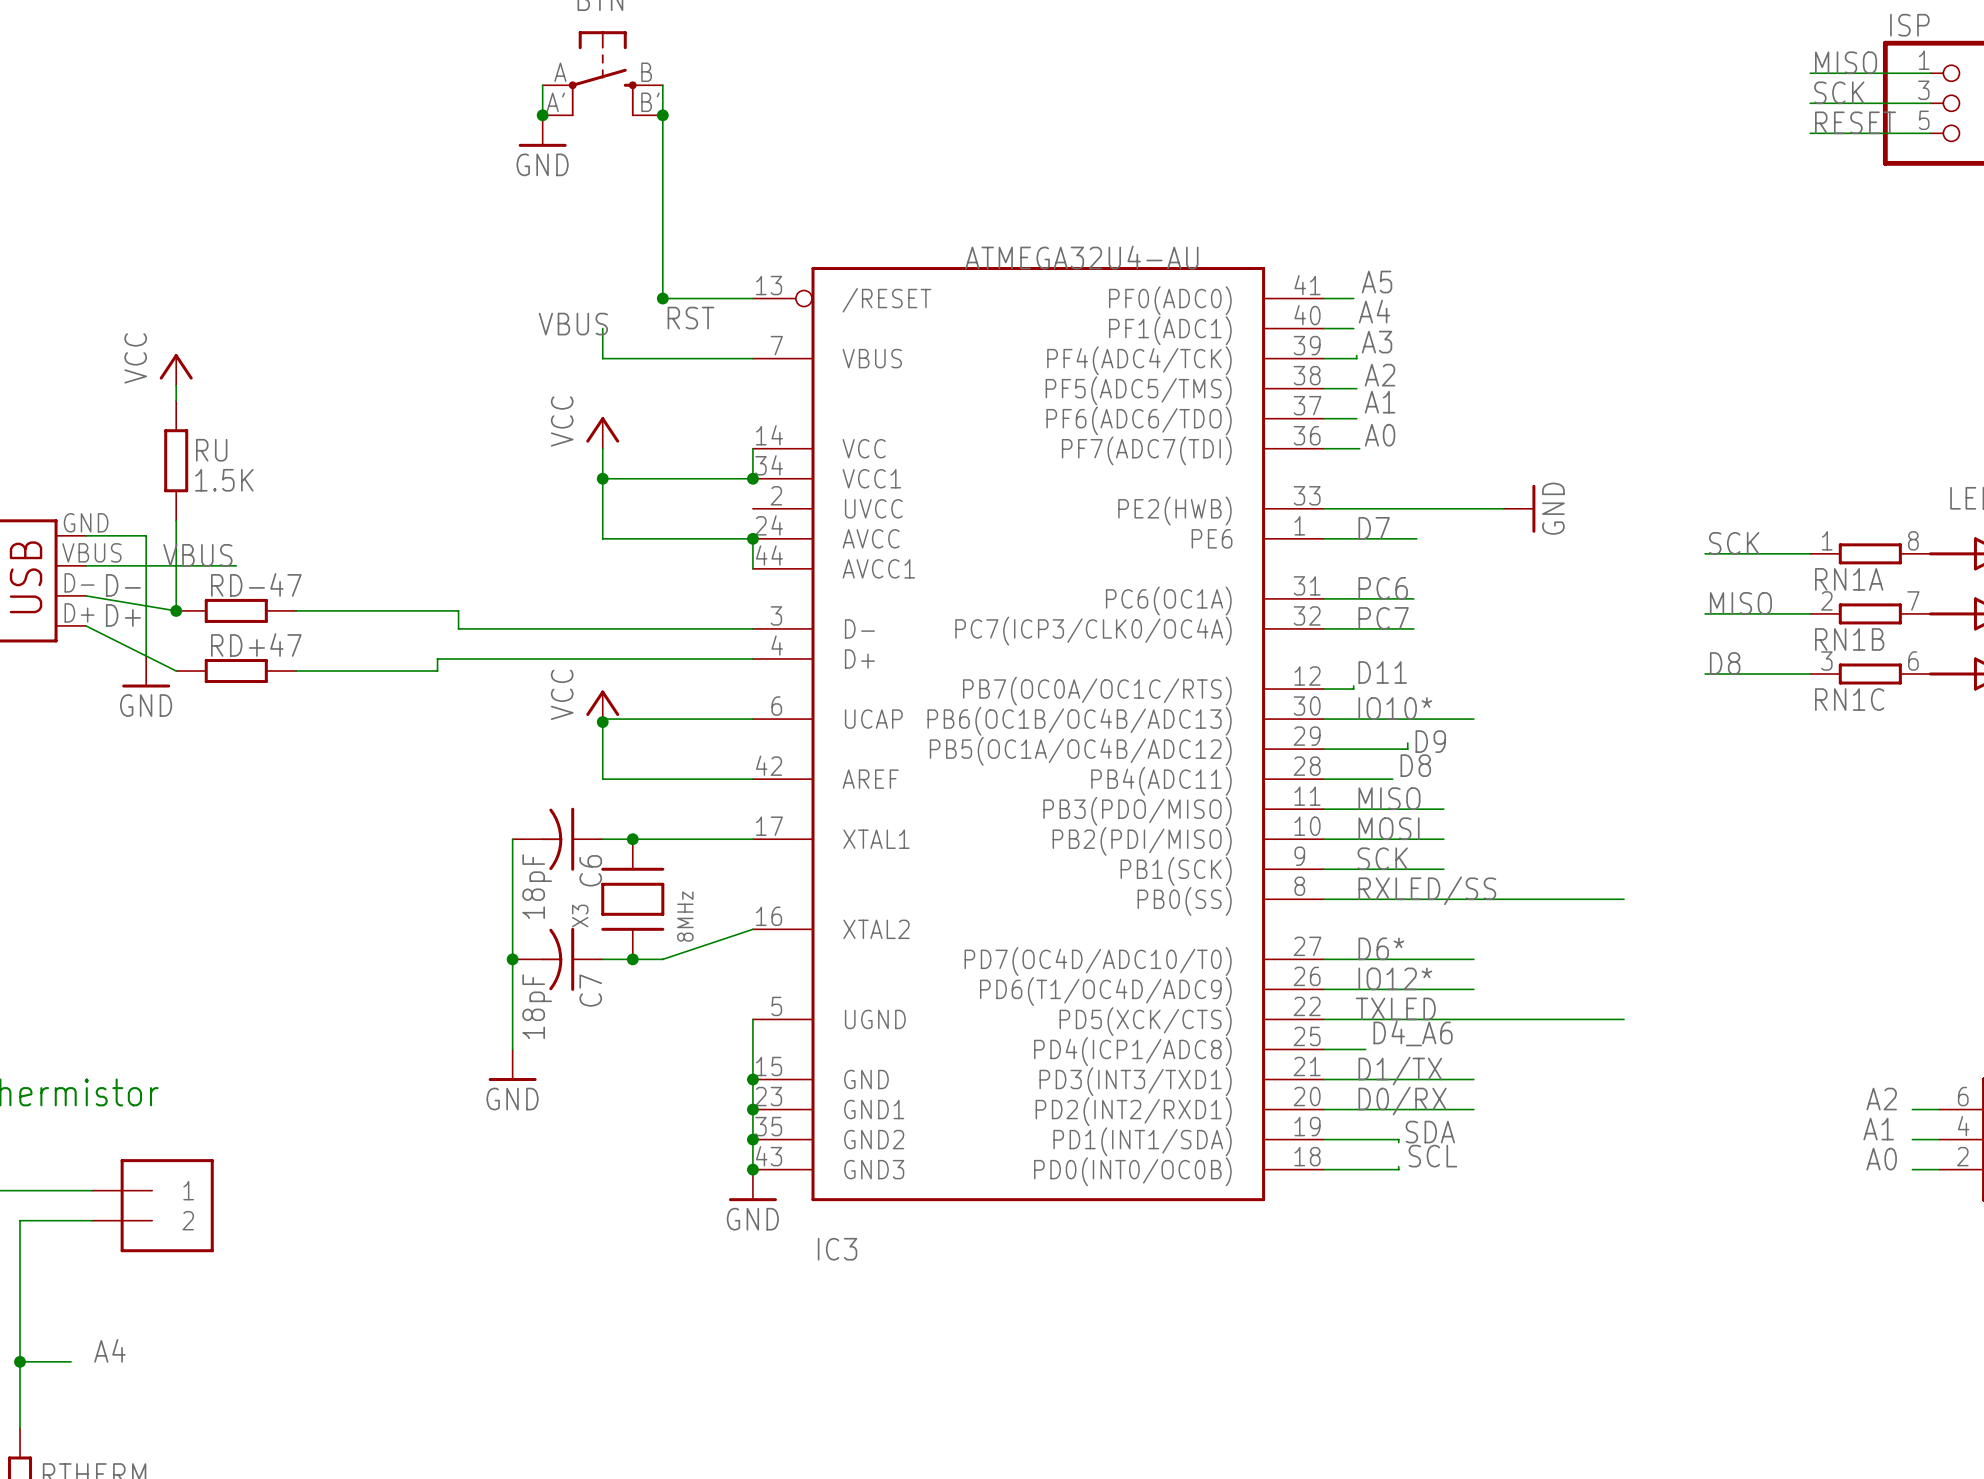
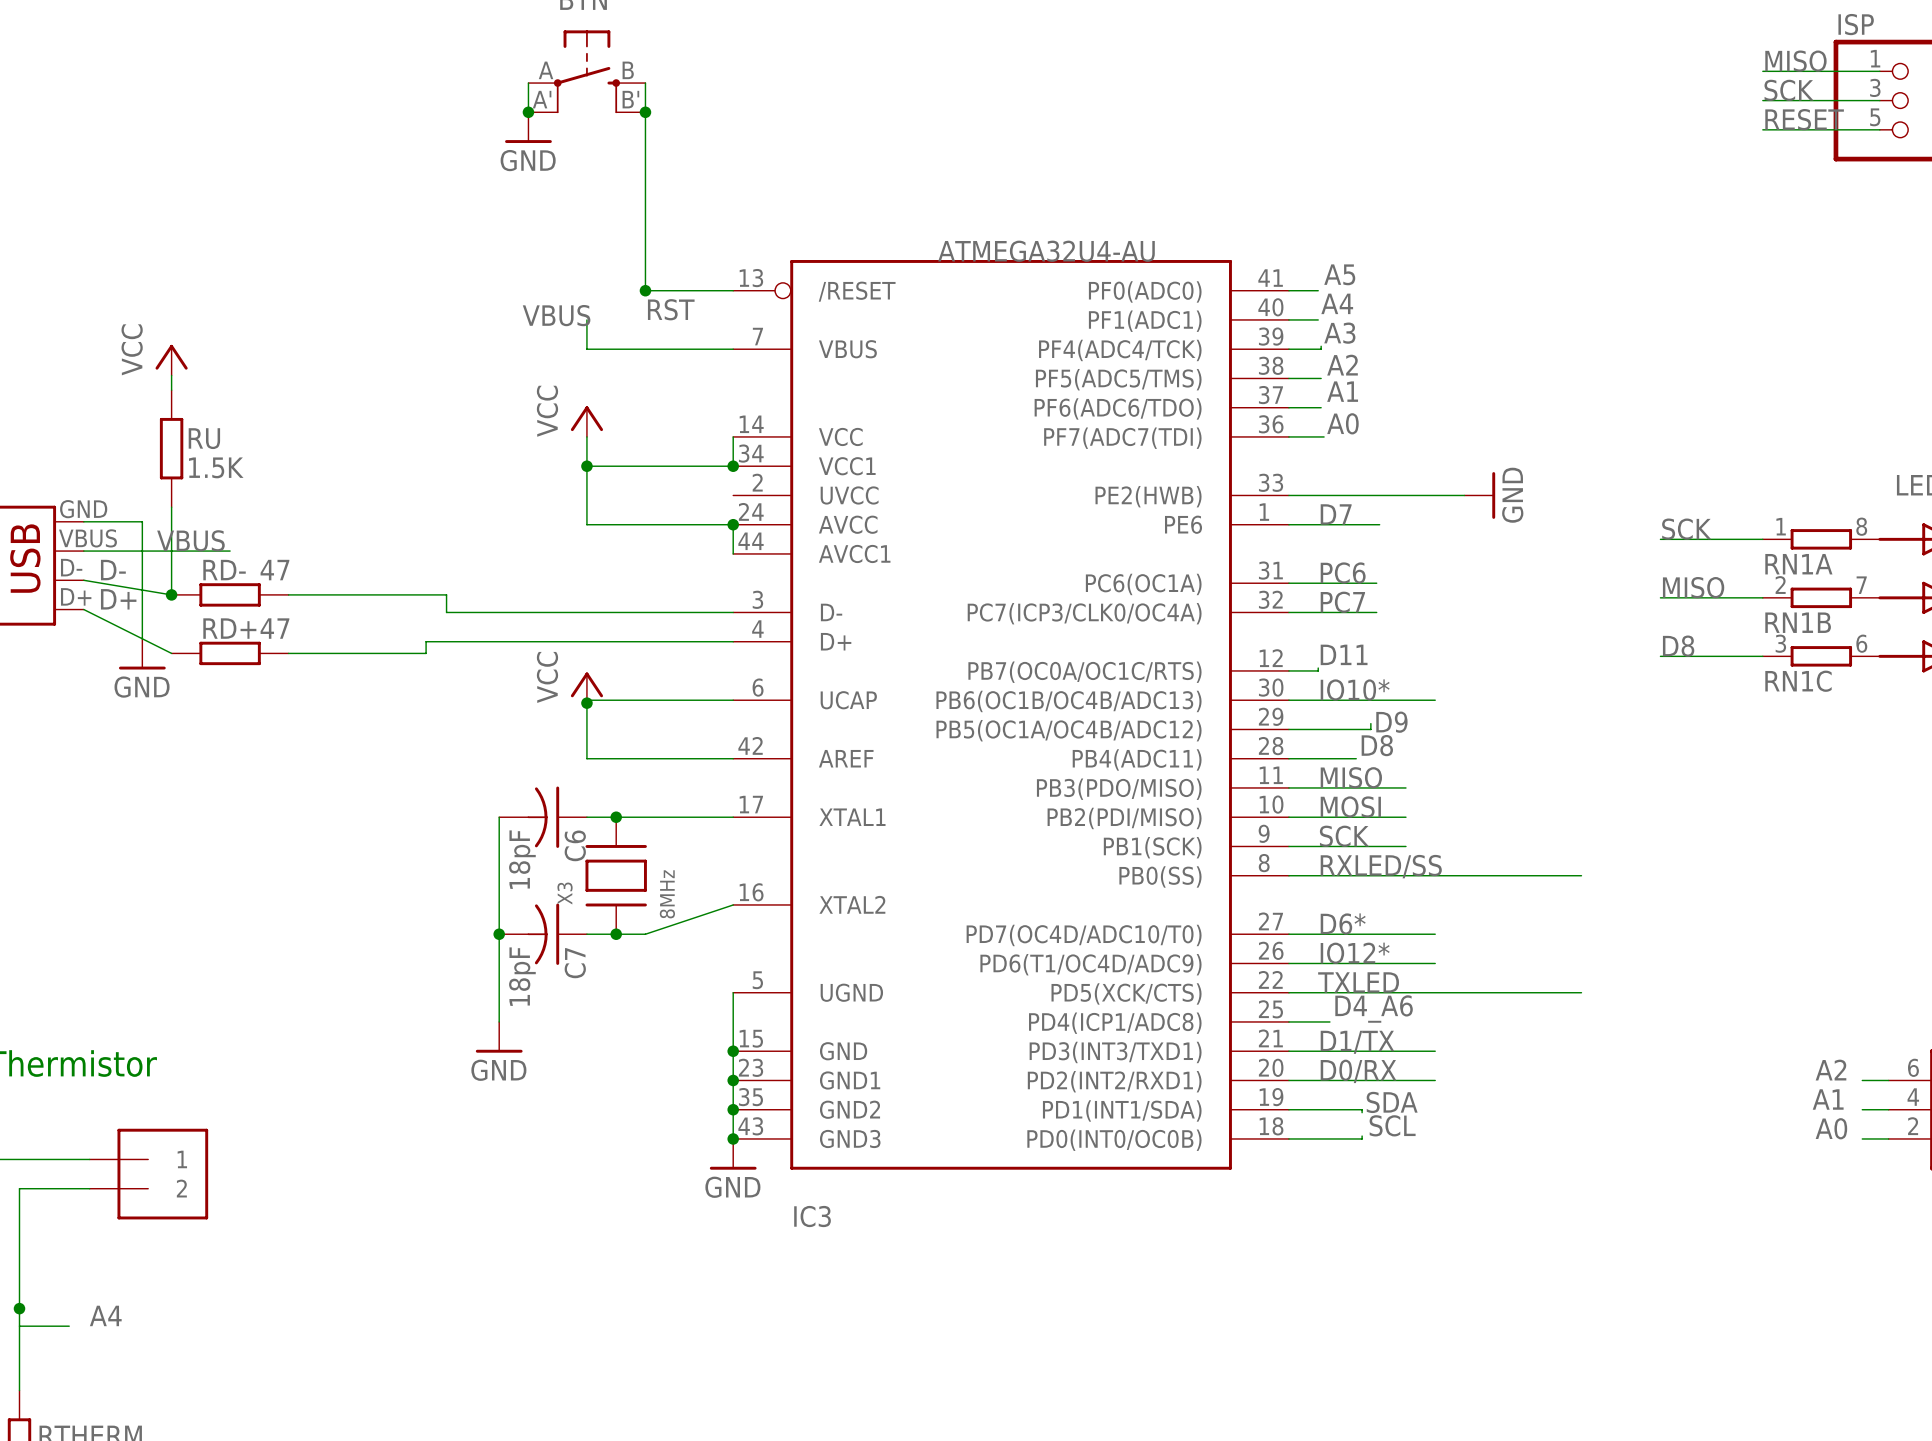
junction position: (20, 1361) -> (19, 1308)

